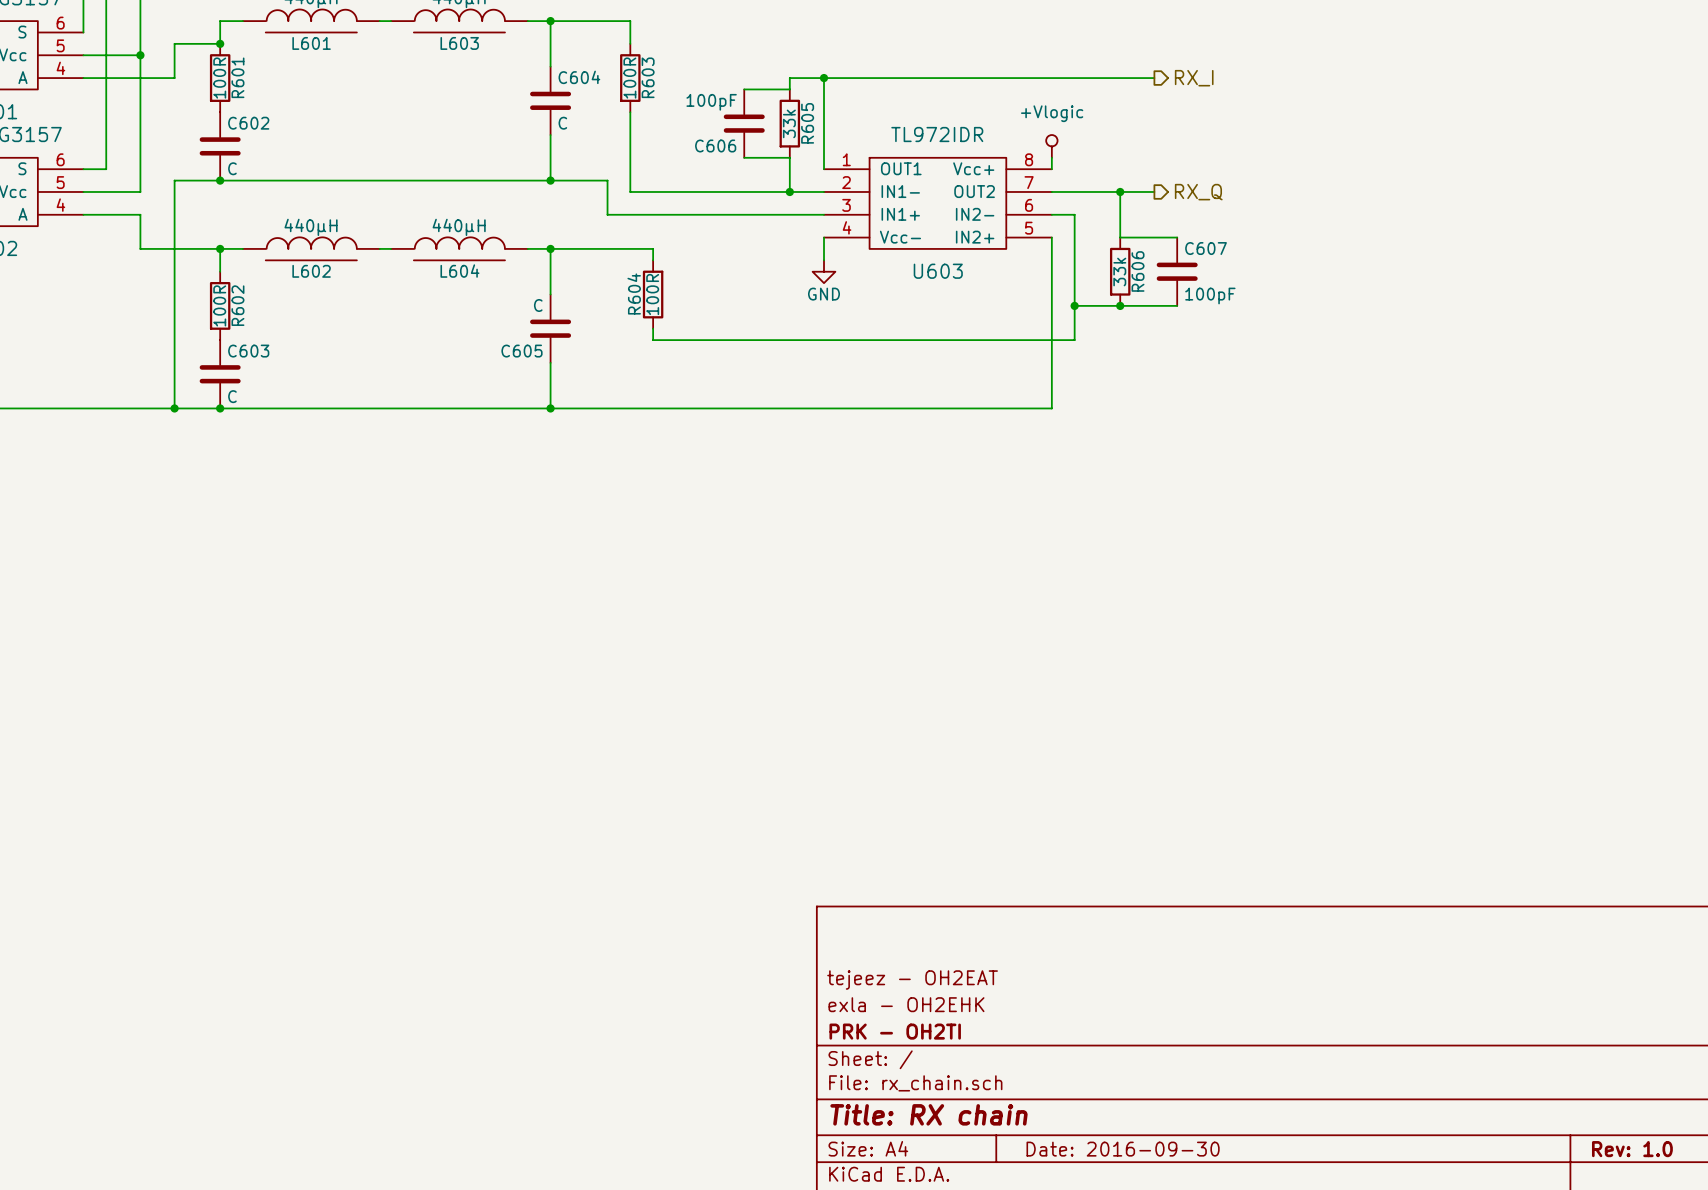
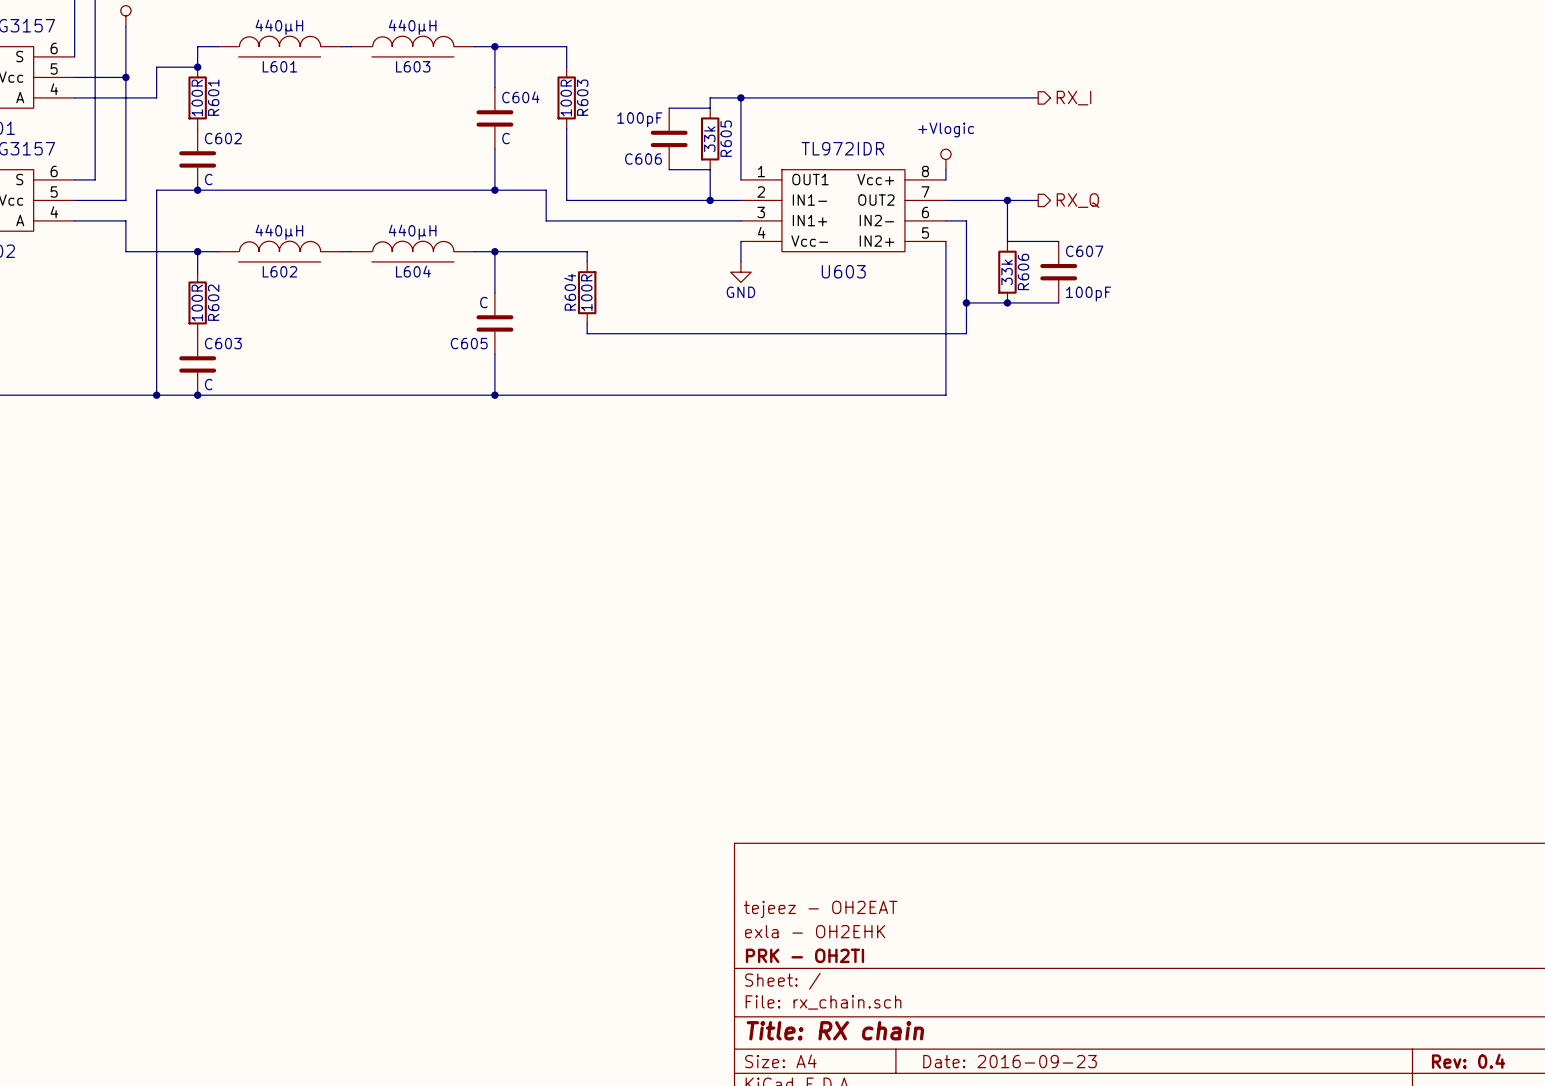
title block: Date: 2016-09-30 (1123, 1149) -> Date: 2016-09-23 (1010, 1061)
title block: Rev: 1.0 (1632, 1149) -> Rev: 0.4 (1468, 1061)

